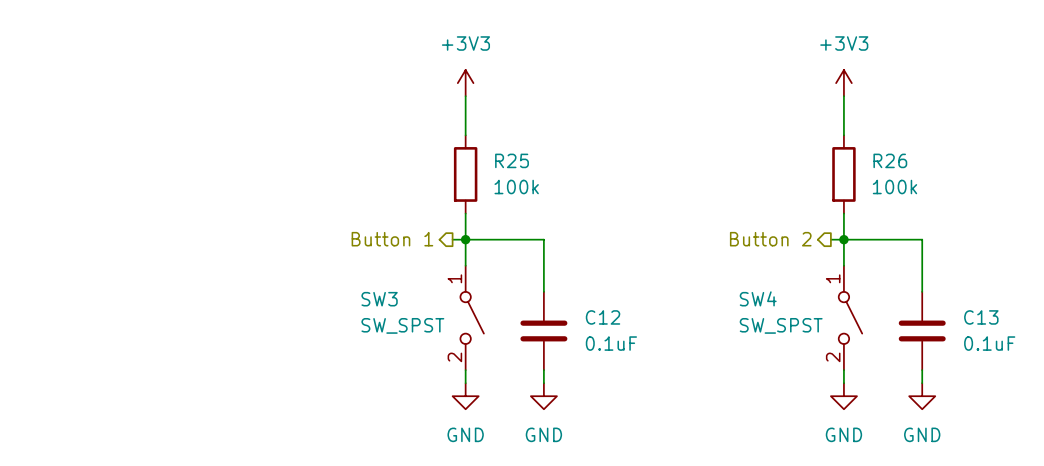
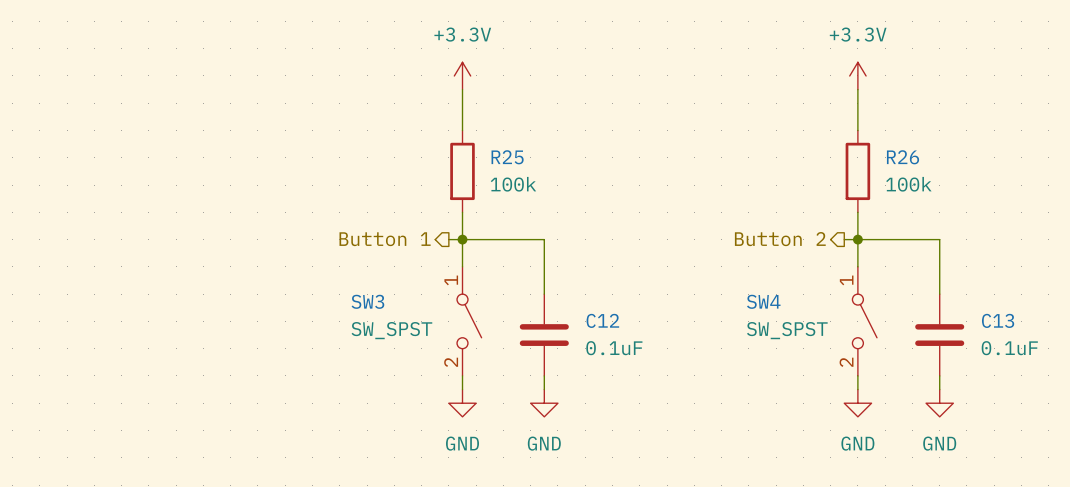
power symbol: +3V3 (465, 83) -> +3.3V (462, 75)
power symbol: +3V3 (843, 83) -> +3.3V (857, 75)

